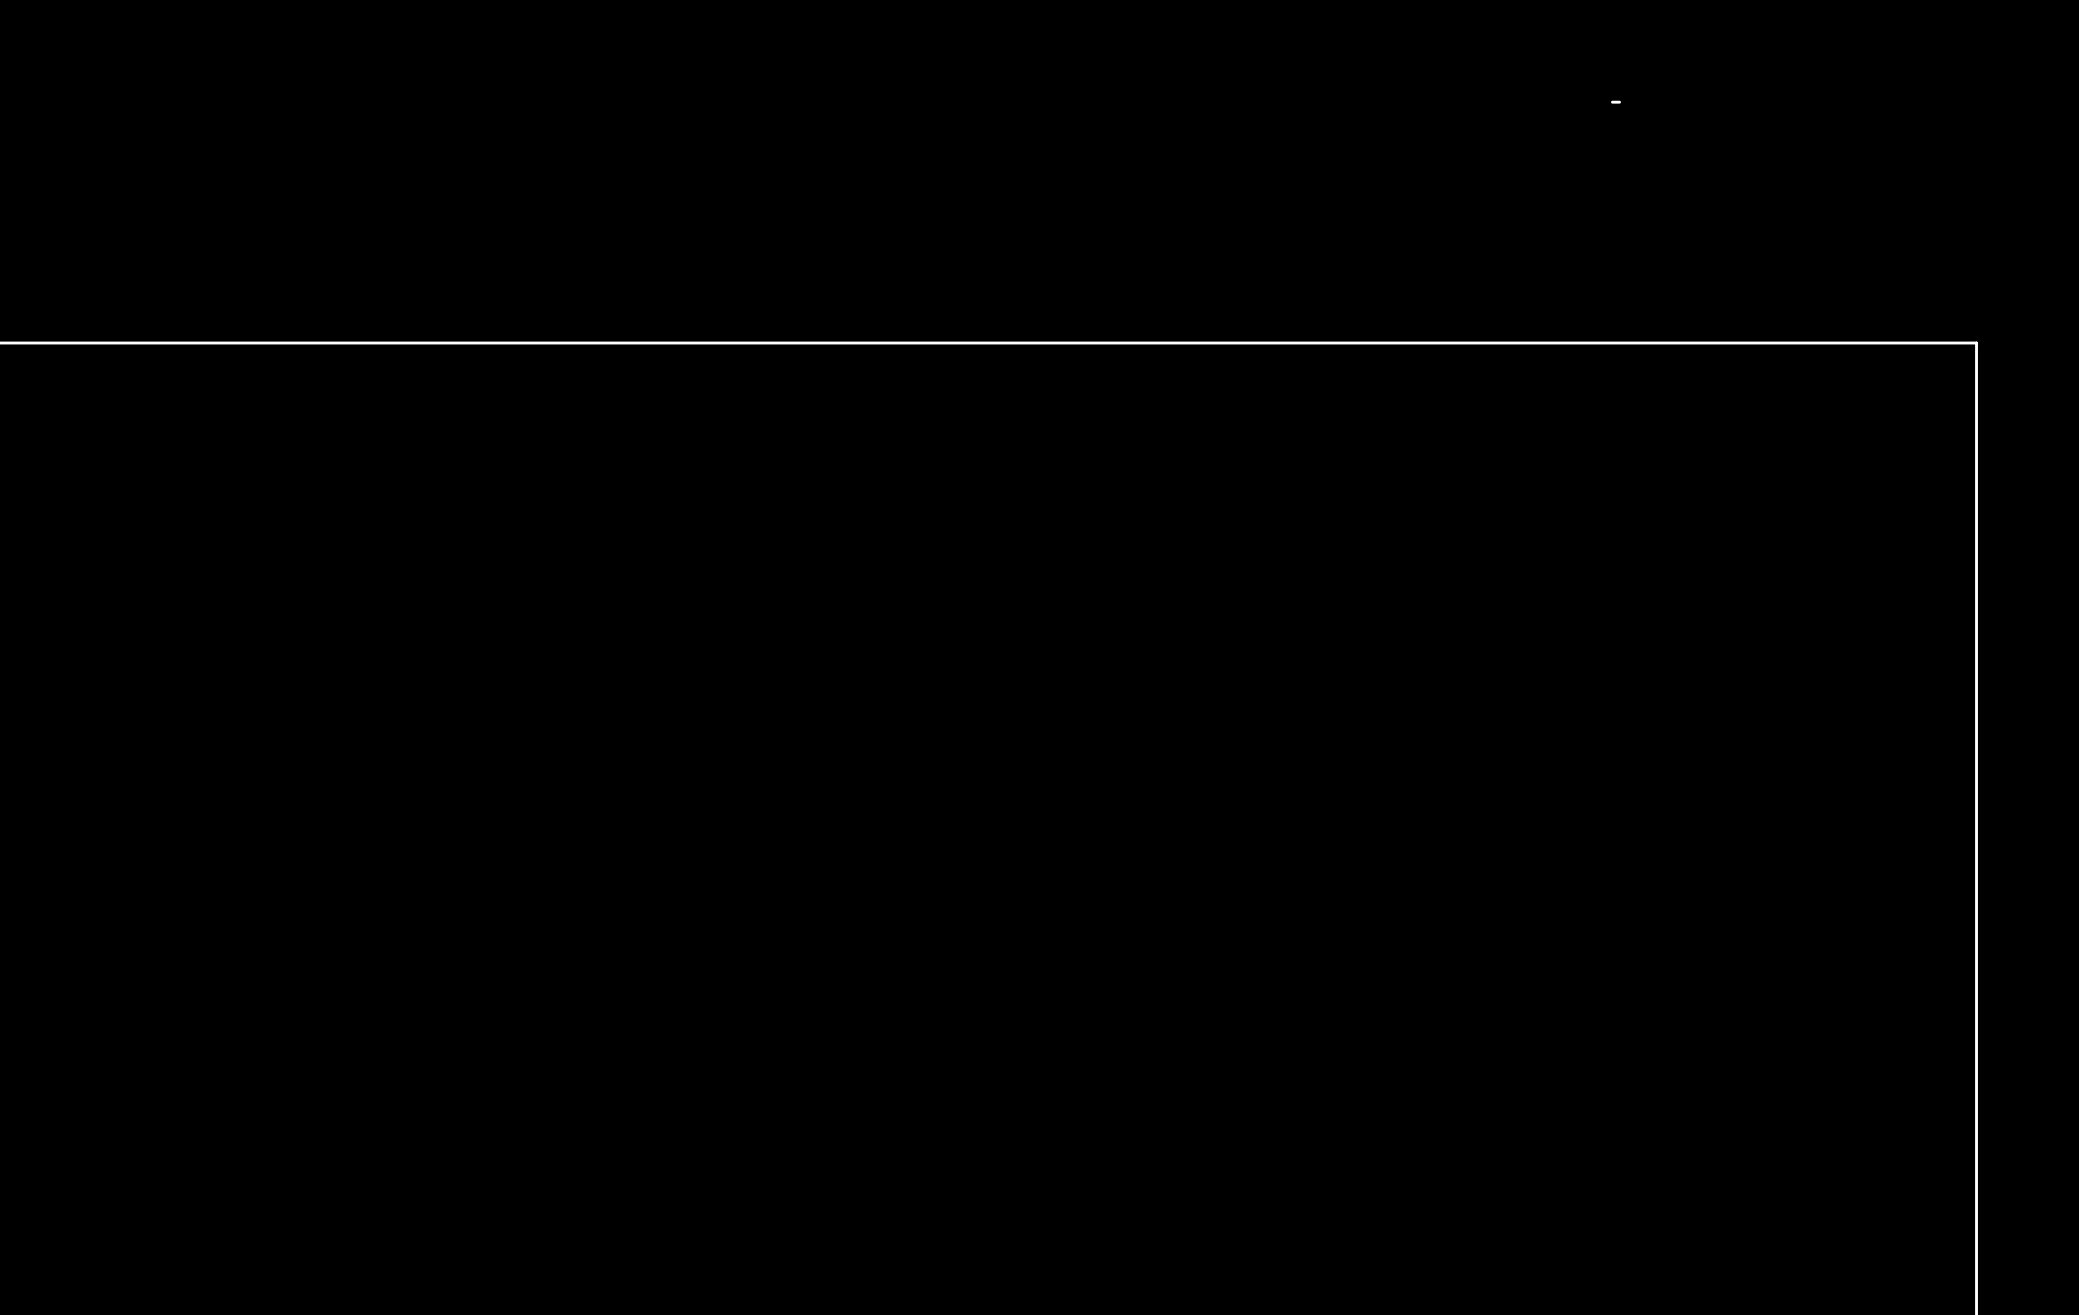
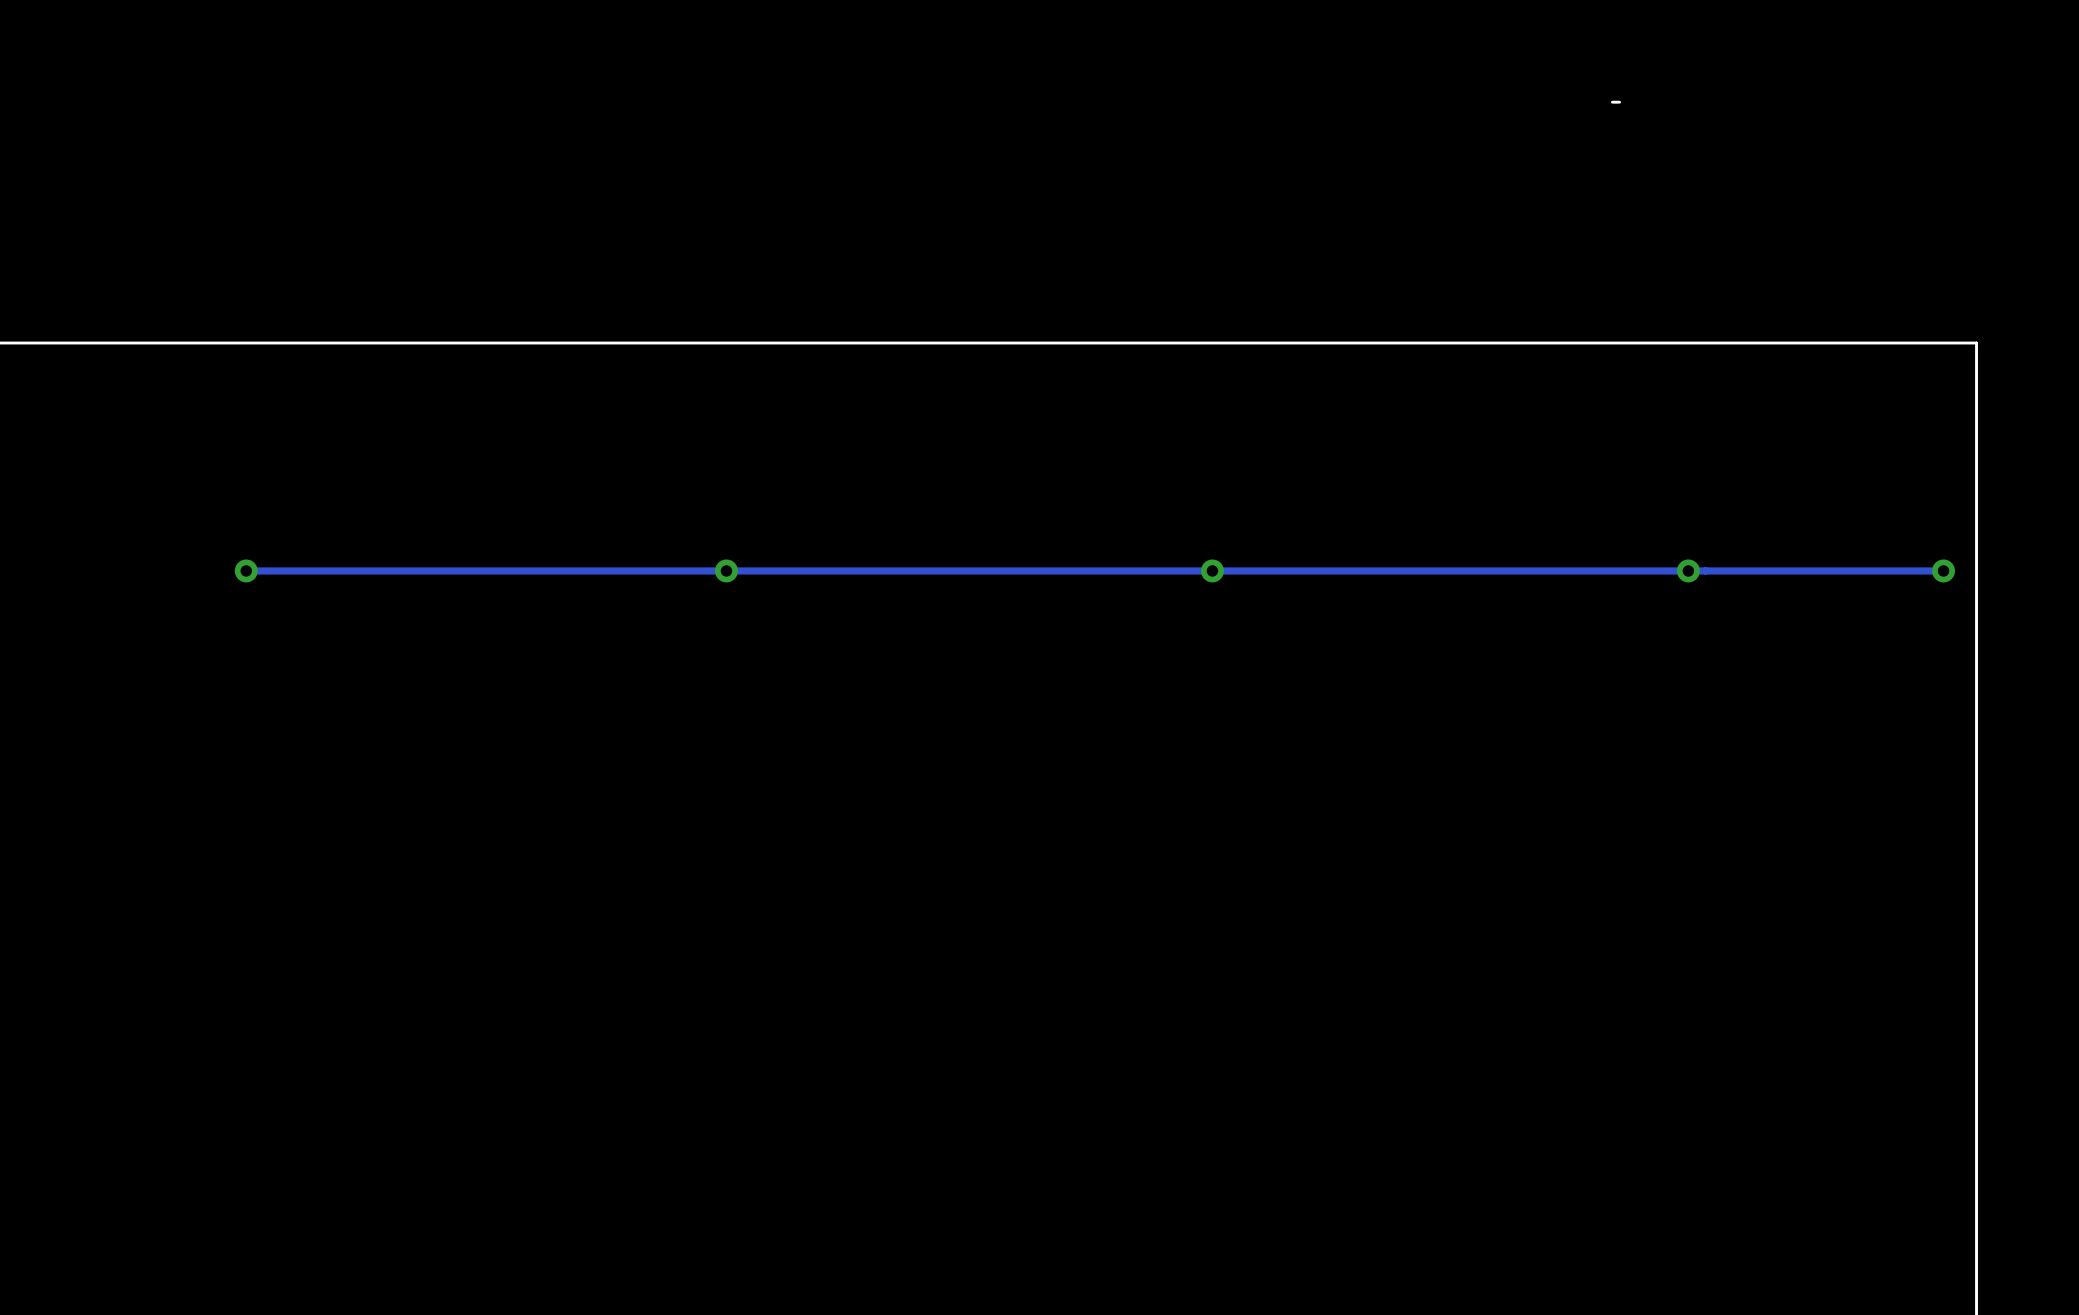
via: none -> (246, 570)
via: none -> (726, 570)
via: none -> (1212, 570)
via: none -> (1688, 570)
track: none -> (1943, 570) (246, 570)
via: none -> (1943, 570)

